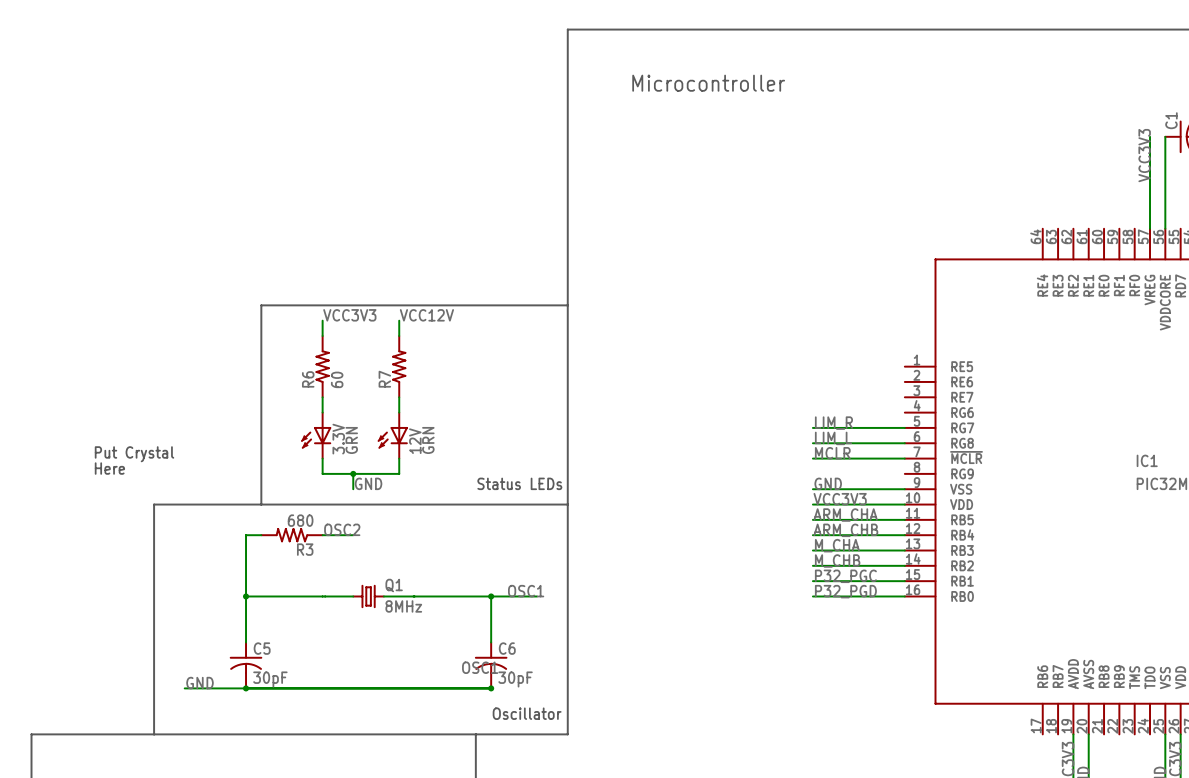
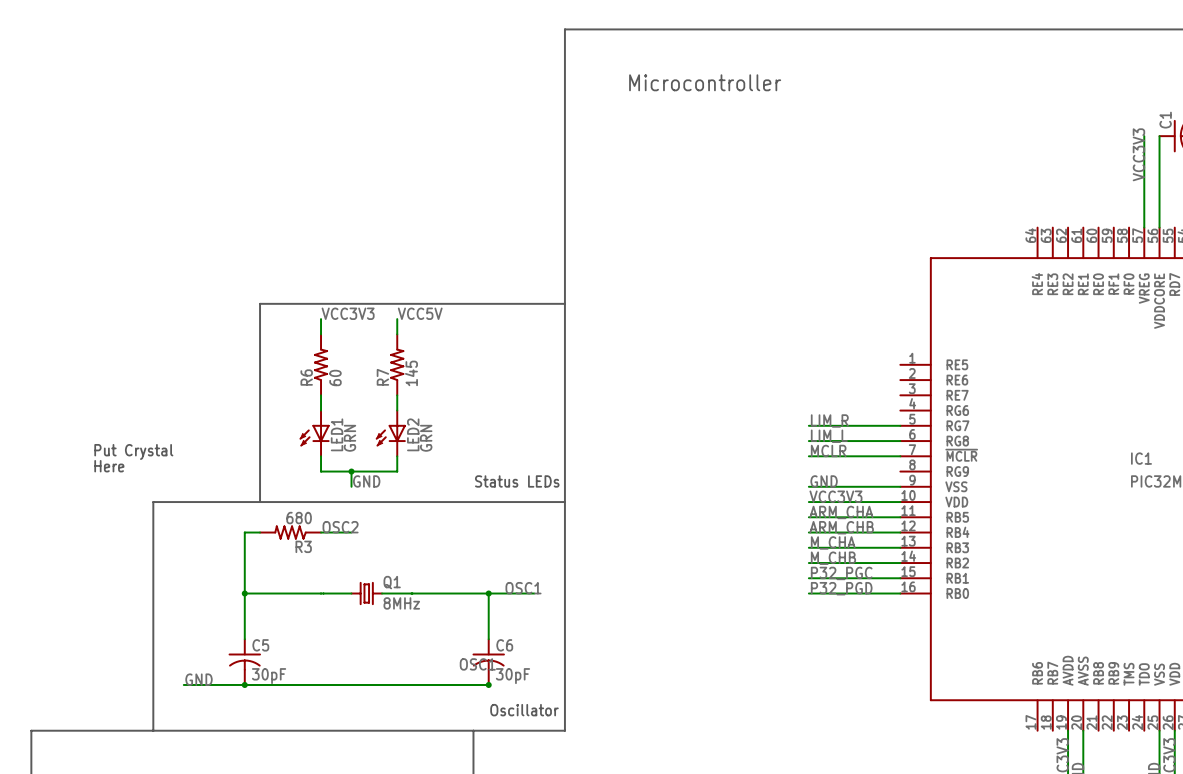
label: VCC12V (426, 315) -> VCC5V (420, 313)
R7 value: none -> 145 (411, 373)
3.3V name: 3.3V (338, 439) -> LED1 (337, 434)
12V name: 12V (415, 441) -> LED2 (413, 434)

